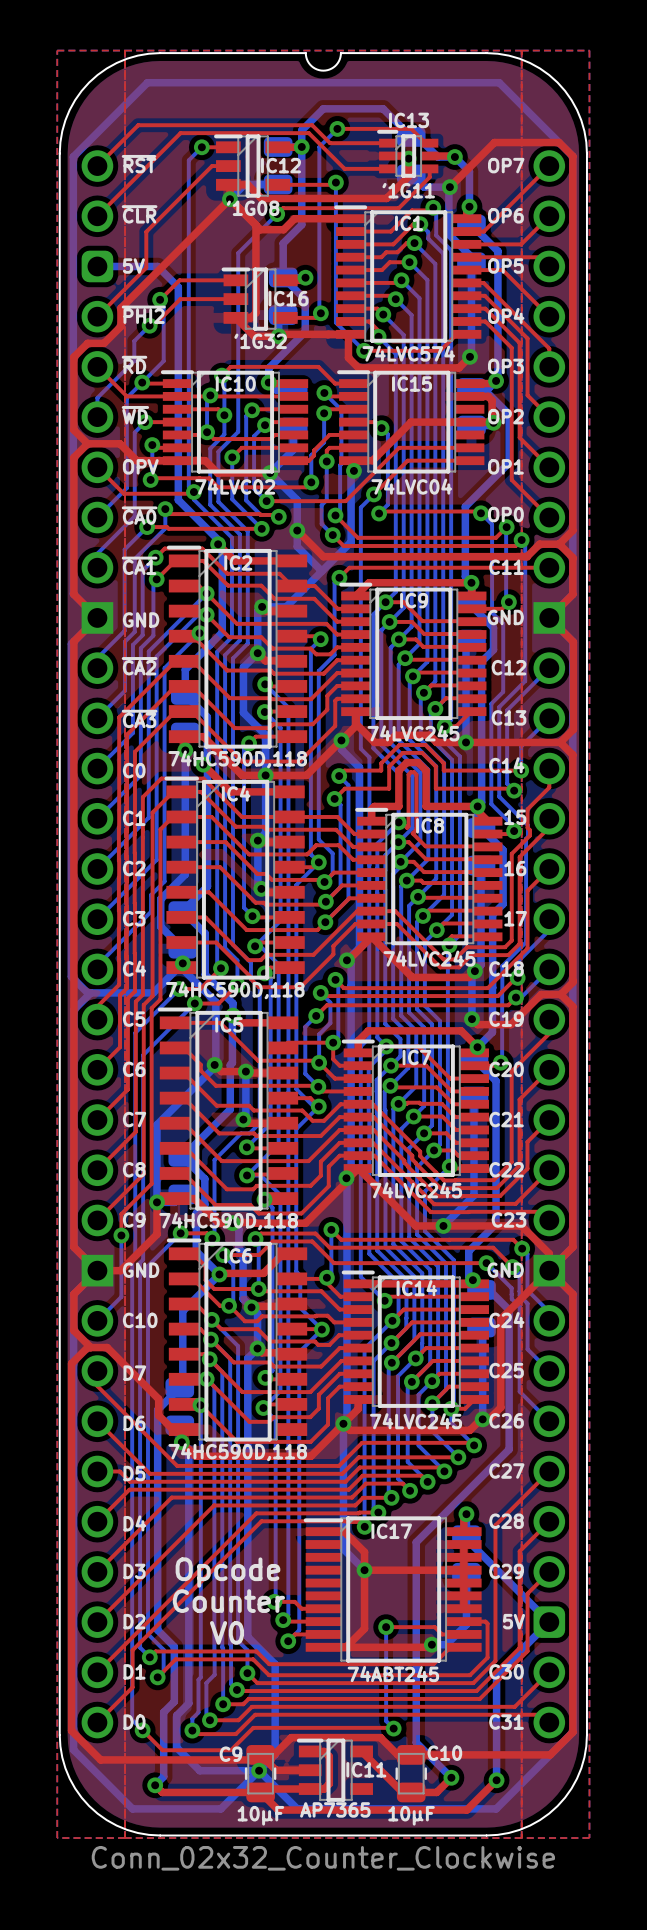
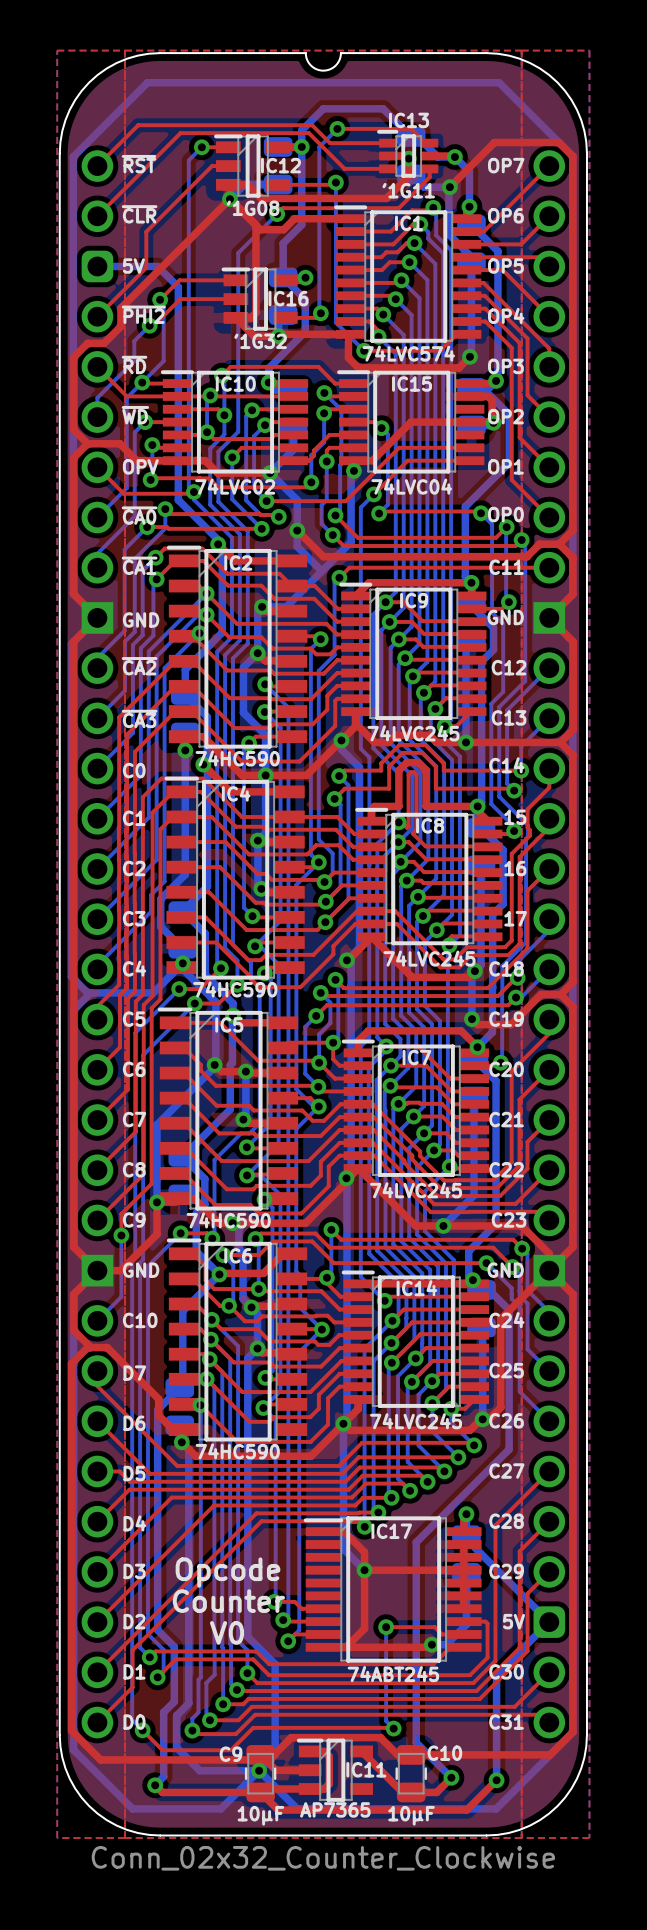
IC2 text: none -> 74HC590 (237, 758)
IC2 value: 74HC590D,118 (237, 759) -> none
IC4 text: none -> 74HC590 (235, 989)
IC4 value: 74HC590D,118 (235, 990) -> none
IC5 text: none -> 74HC590 (228, 1220)
IC5 value: 74HC590D,118 (228, 1221) -> none
IC6 text: none -> 74HC590 (237, 1451)
IC6 value: 74HC590D,118 (237, 1452) -> none

